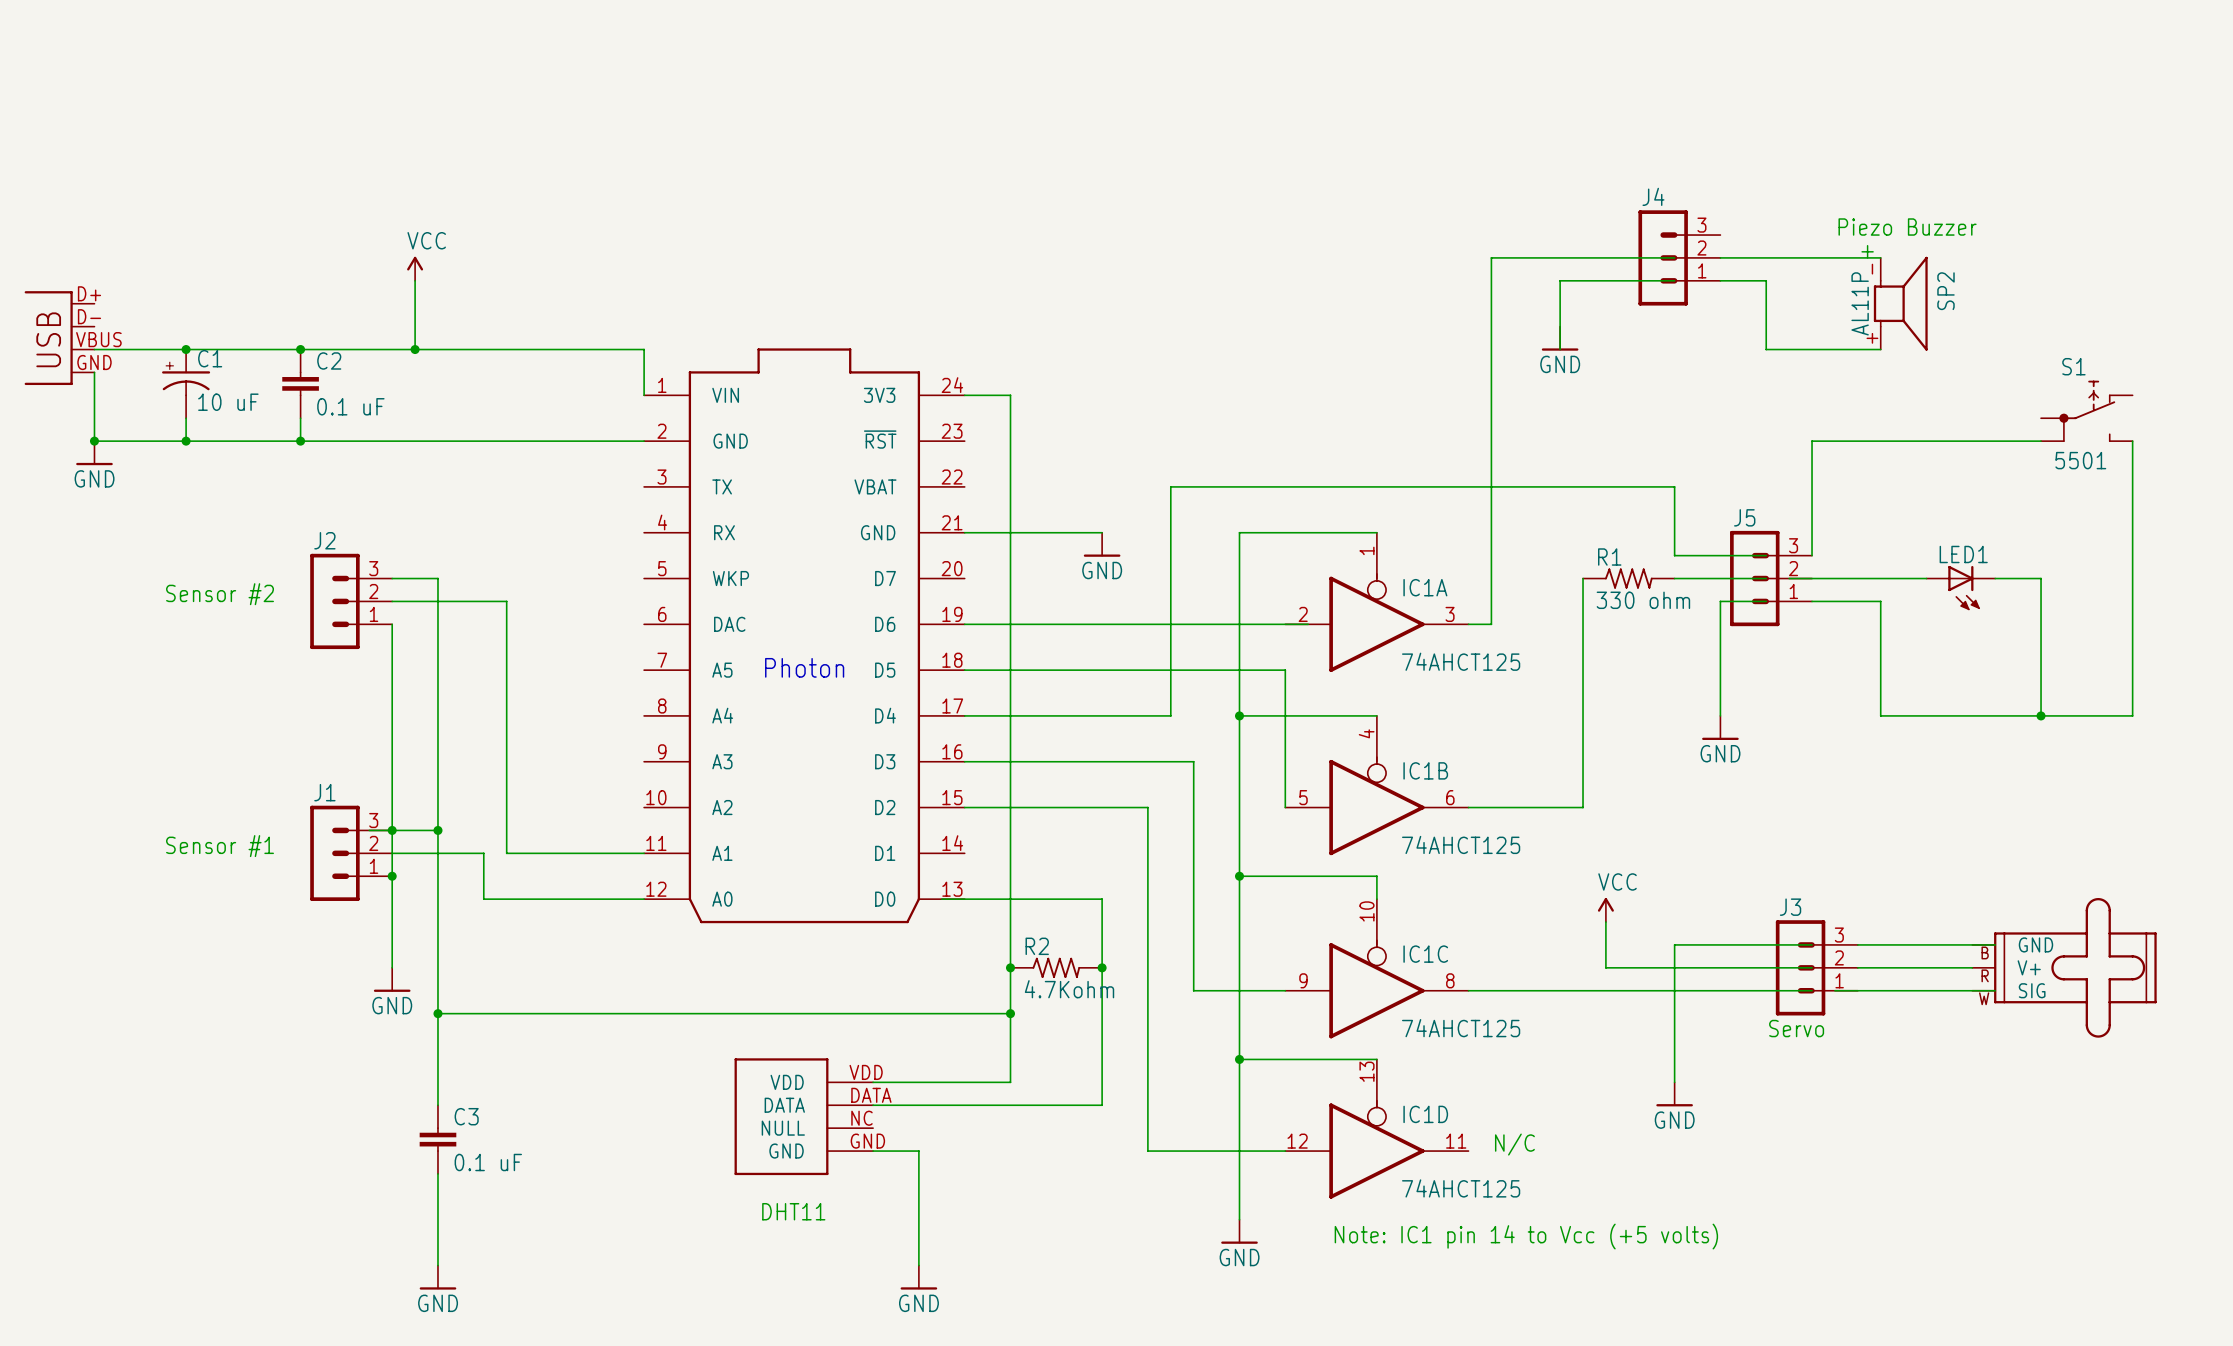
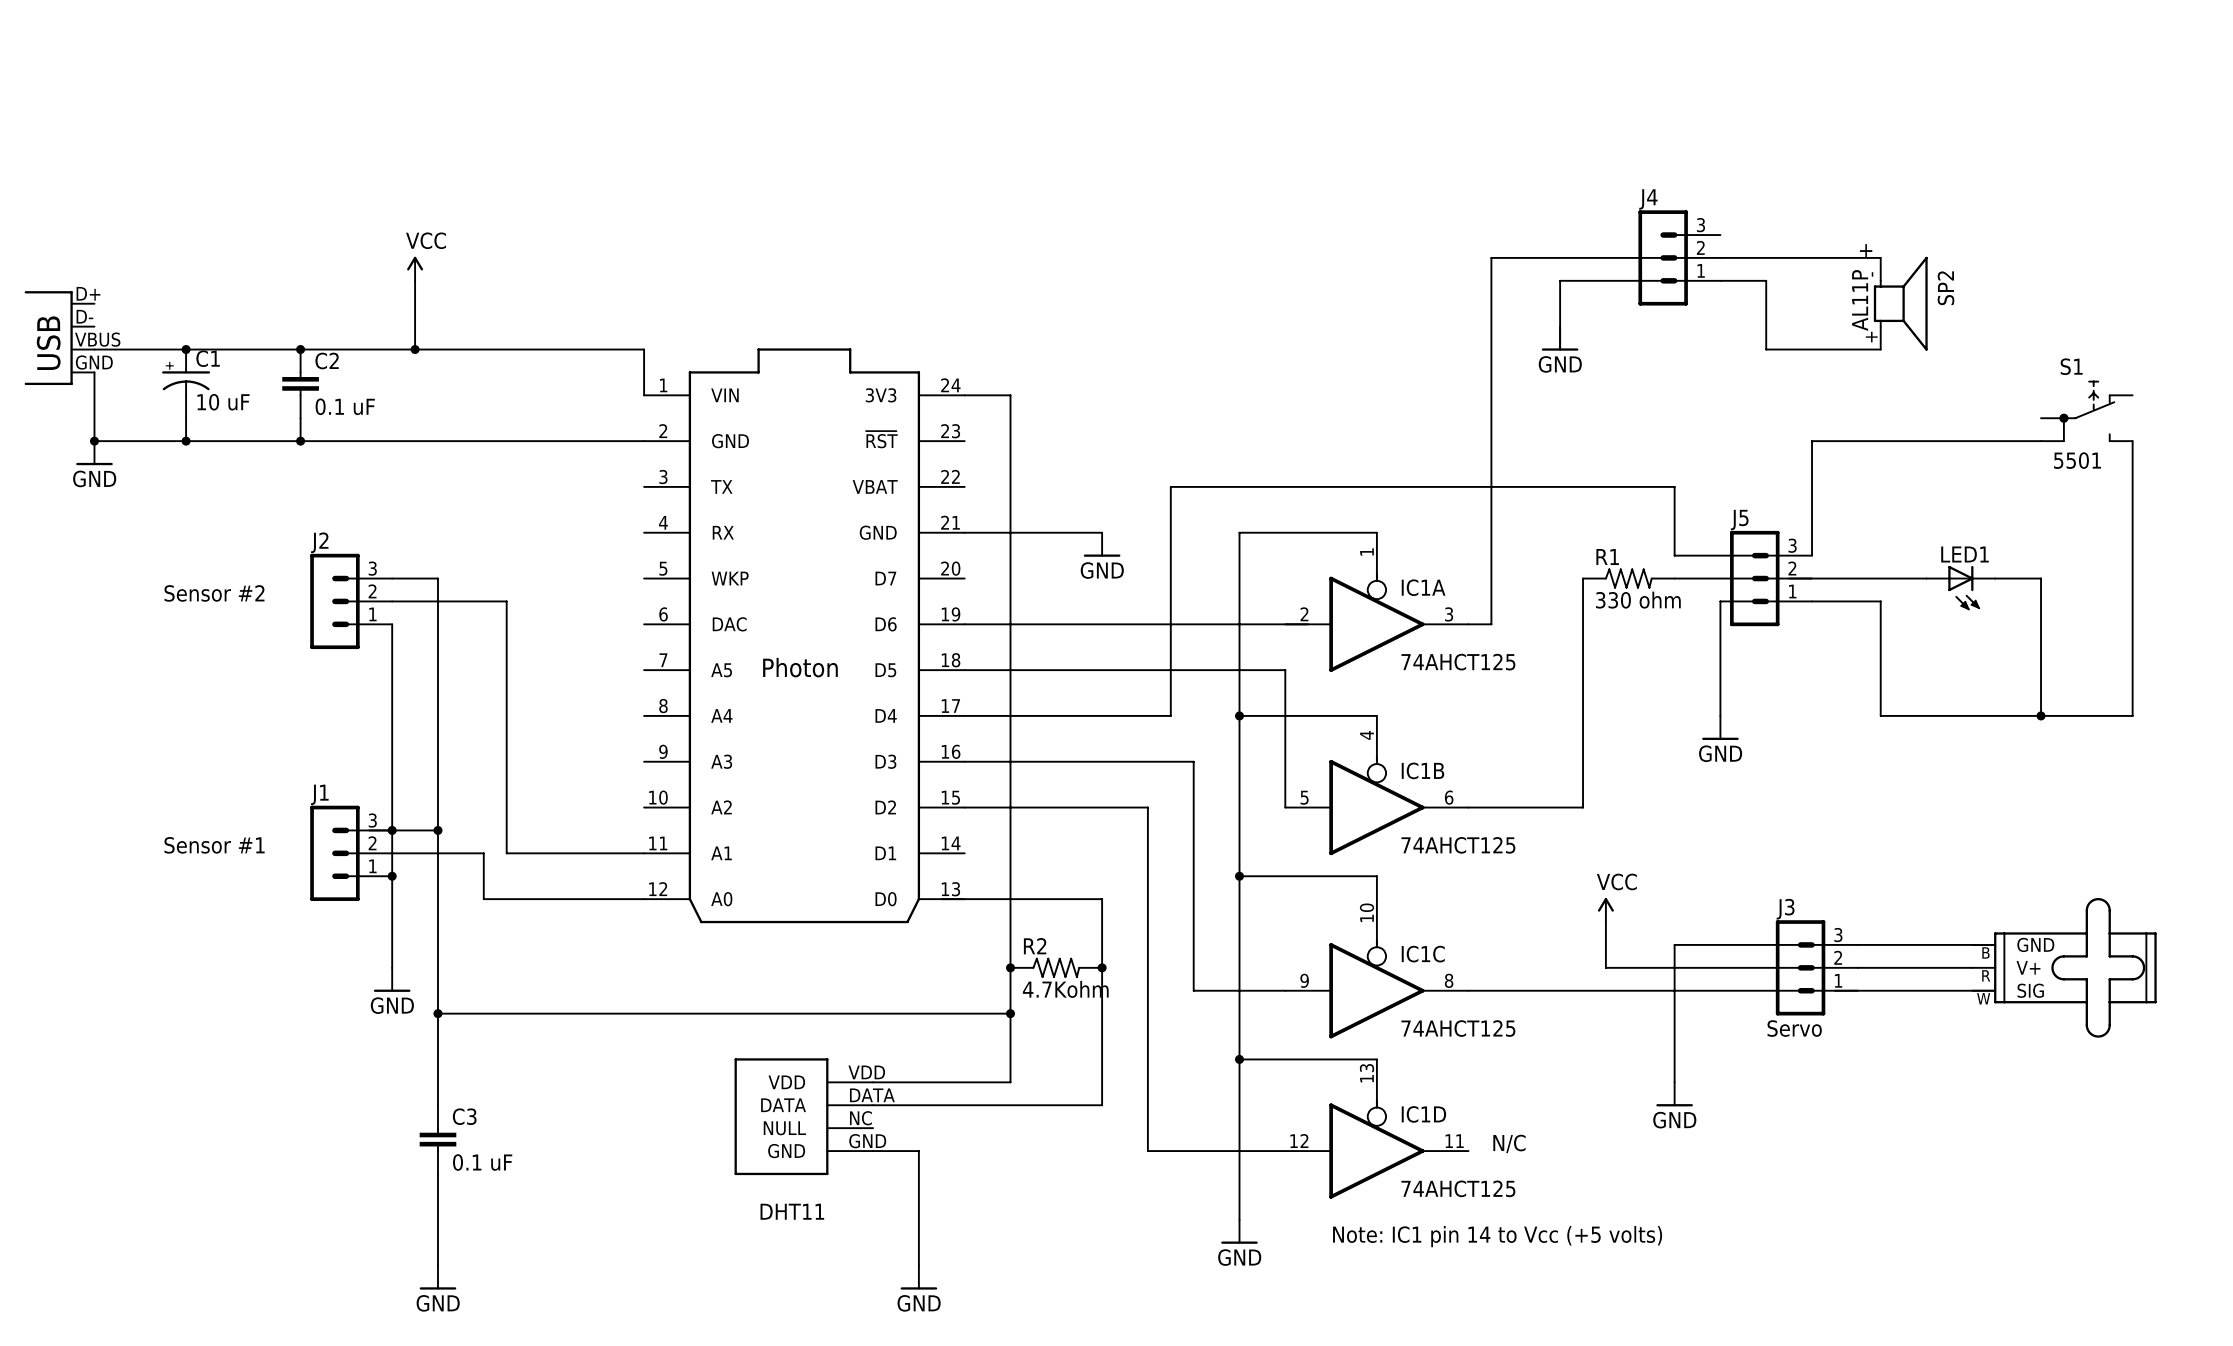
text: Piezo Buzzer (1907, 227) -> none

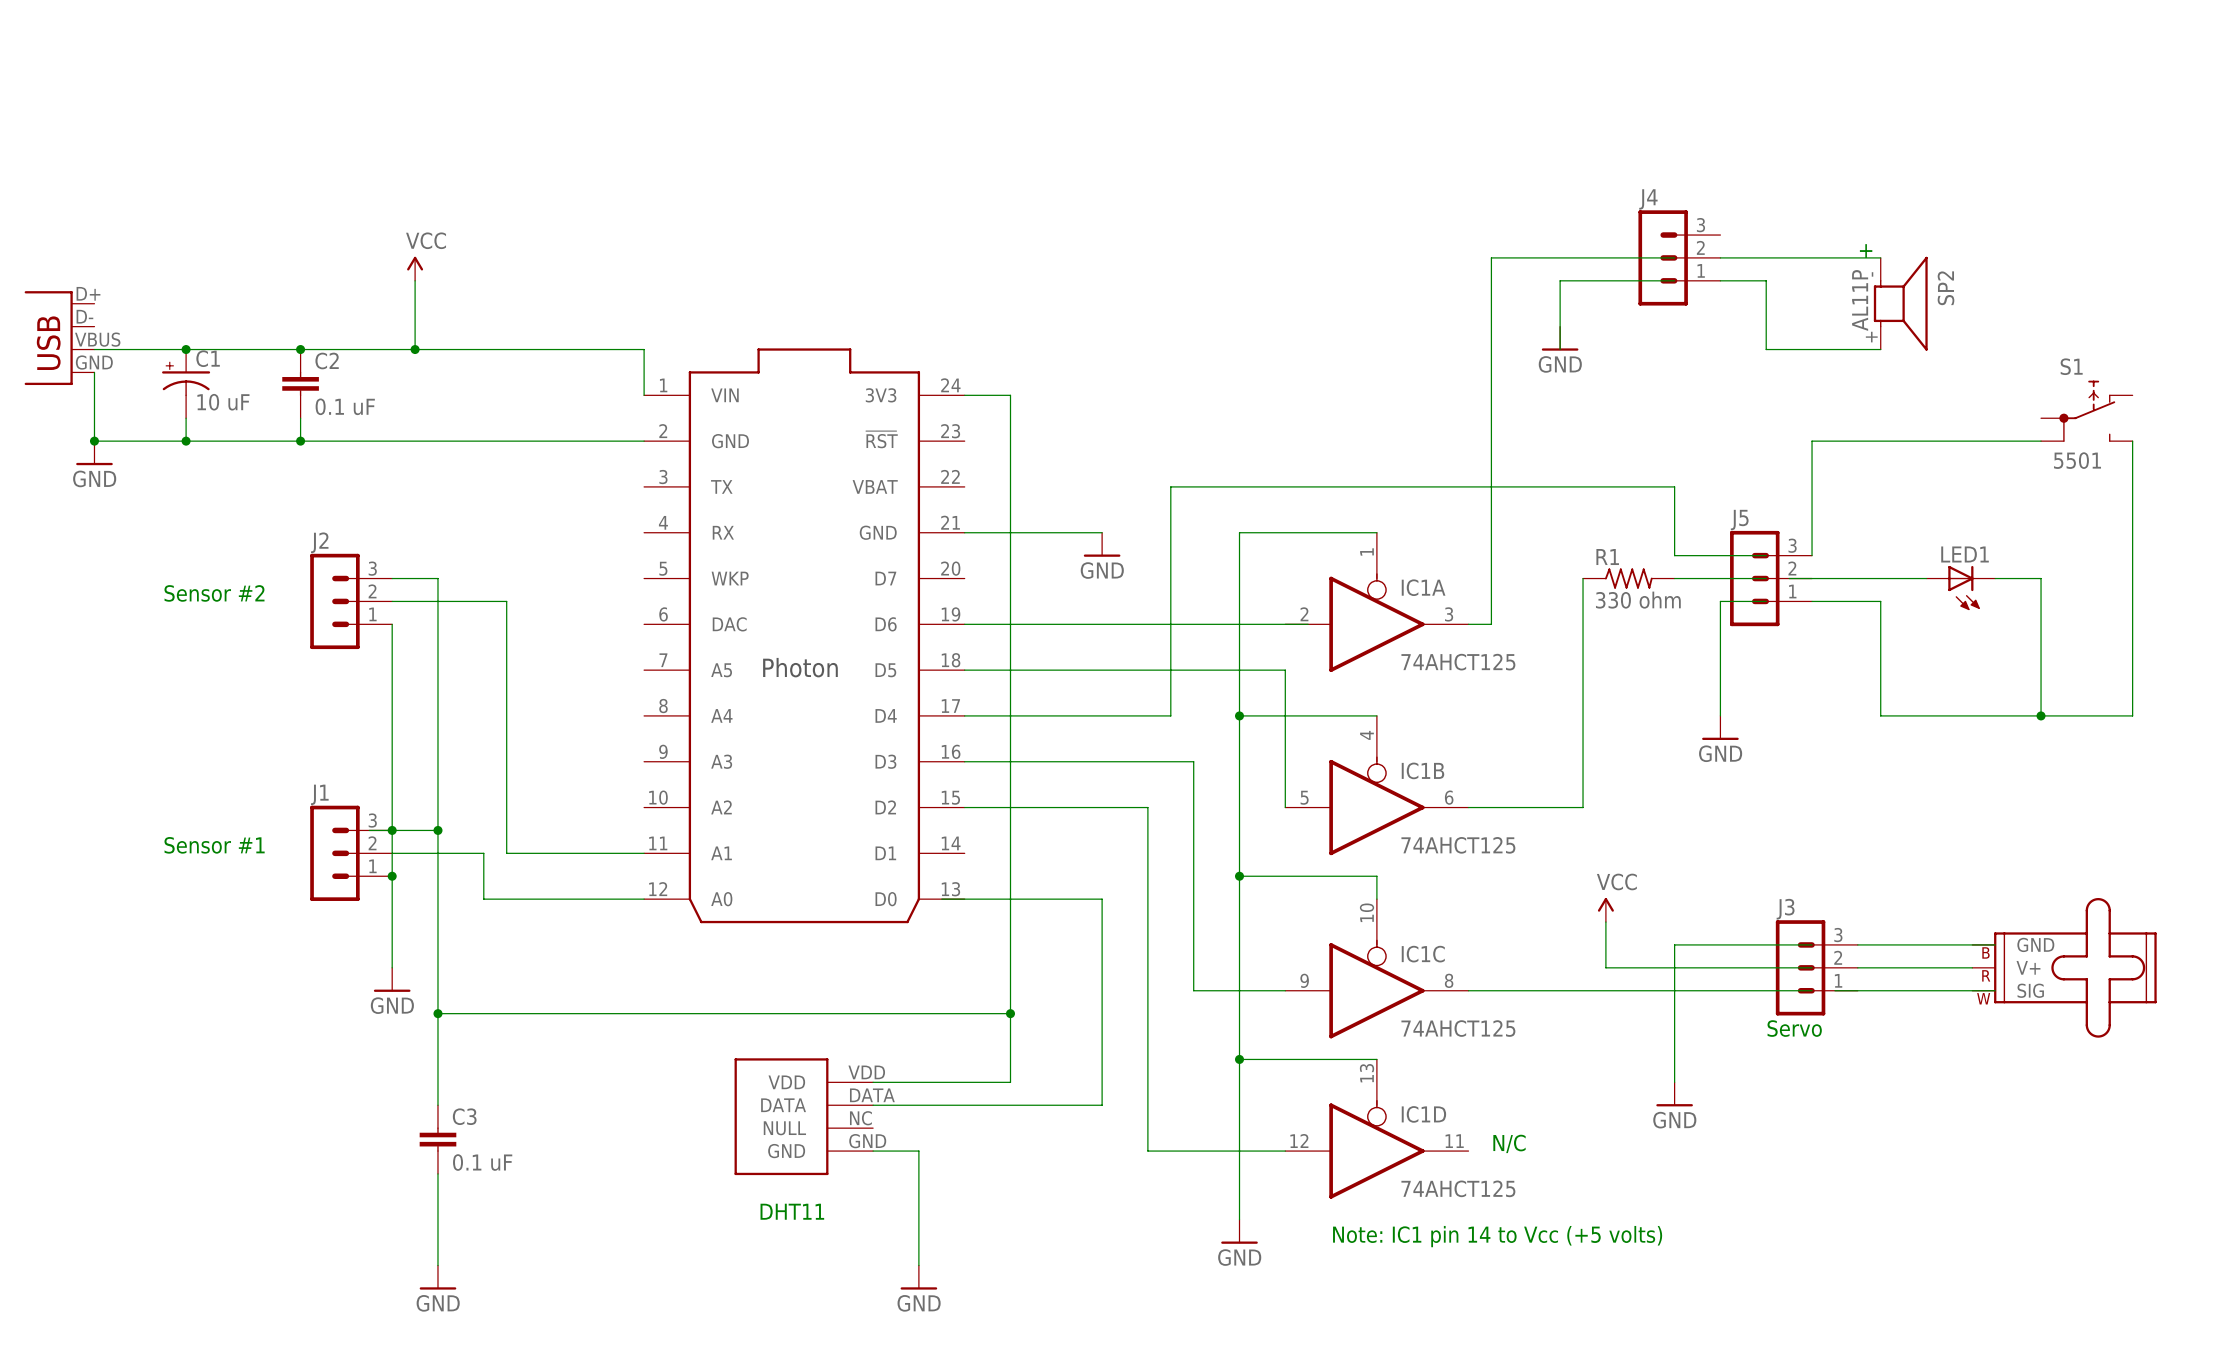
junction: (1010, 967) -> none
R2: 4.7Kohm (1056, 967) -> none
junction: (1102, 967) -> none

